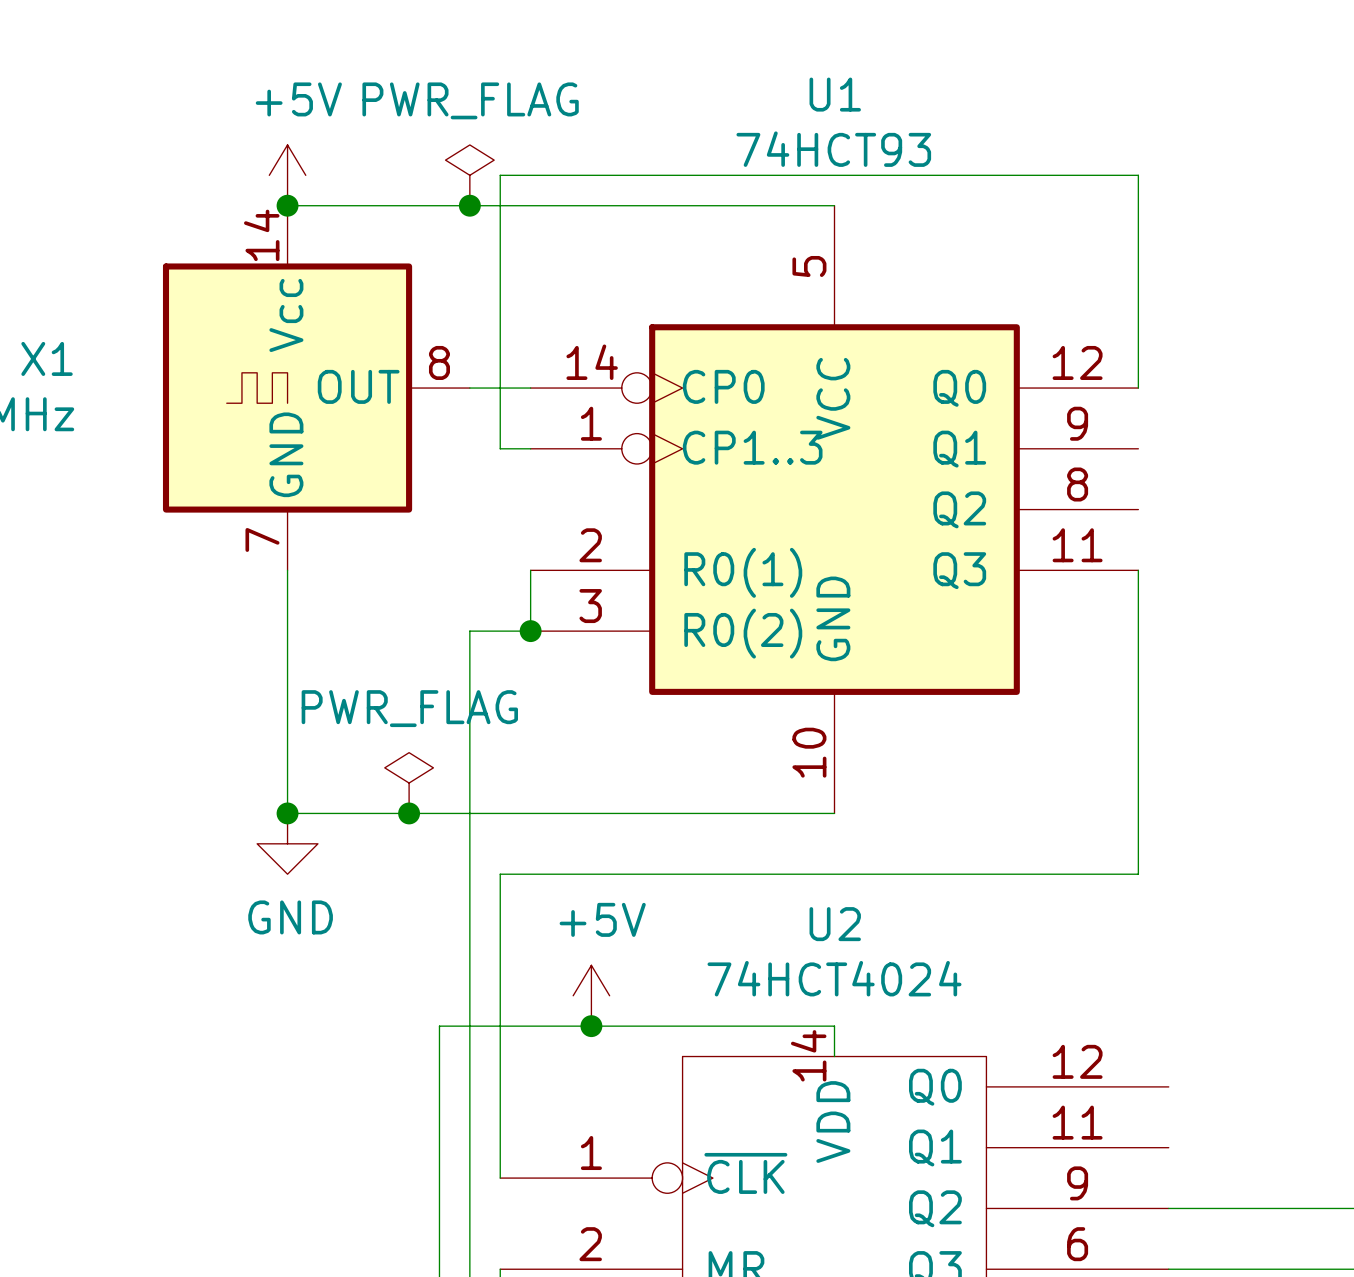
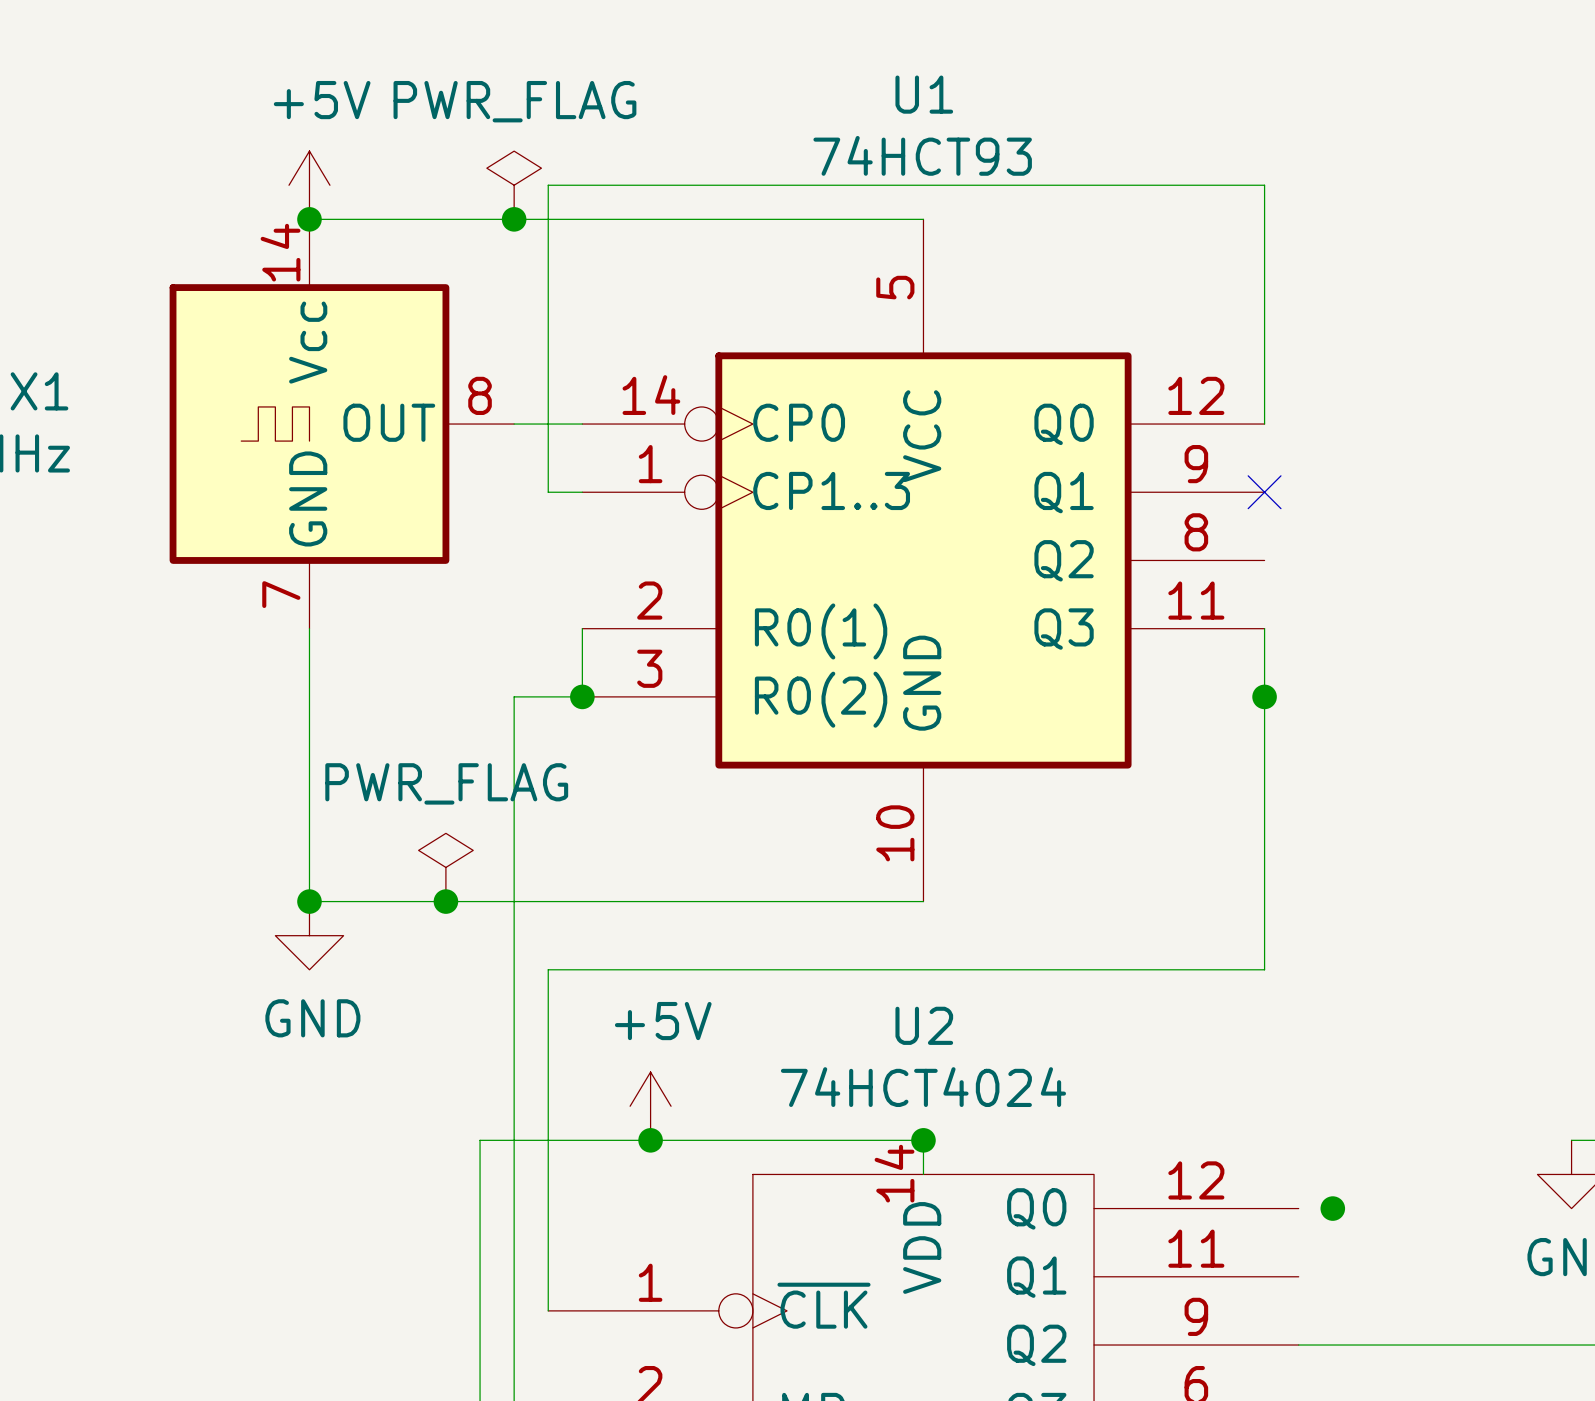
no-connect mark: none -> (1264, 492)
junction: none -> (1264, 696)
junction: none -> (923, 1140)
junction: none -> (1332, 1208)

